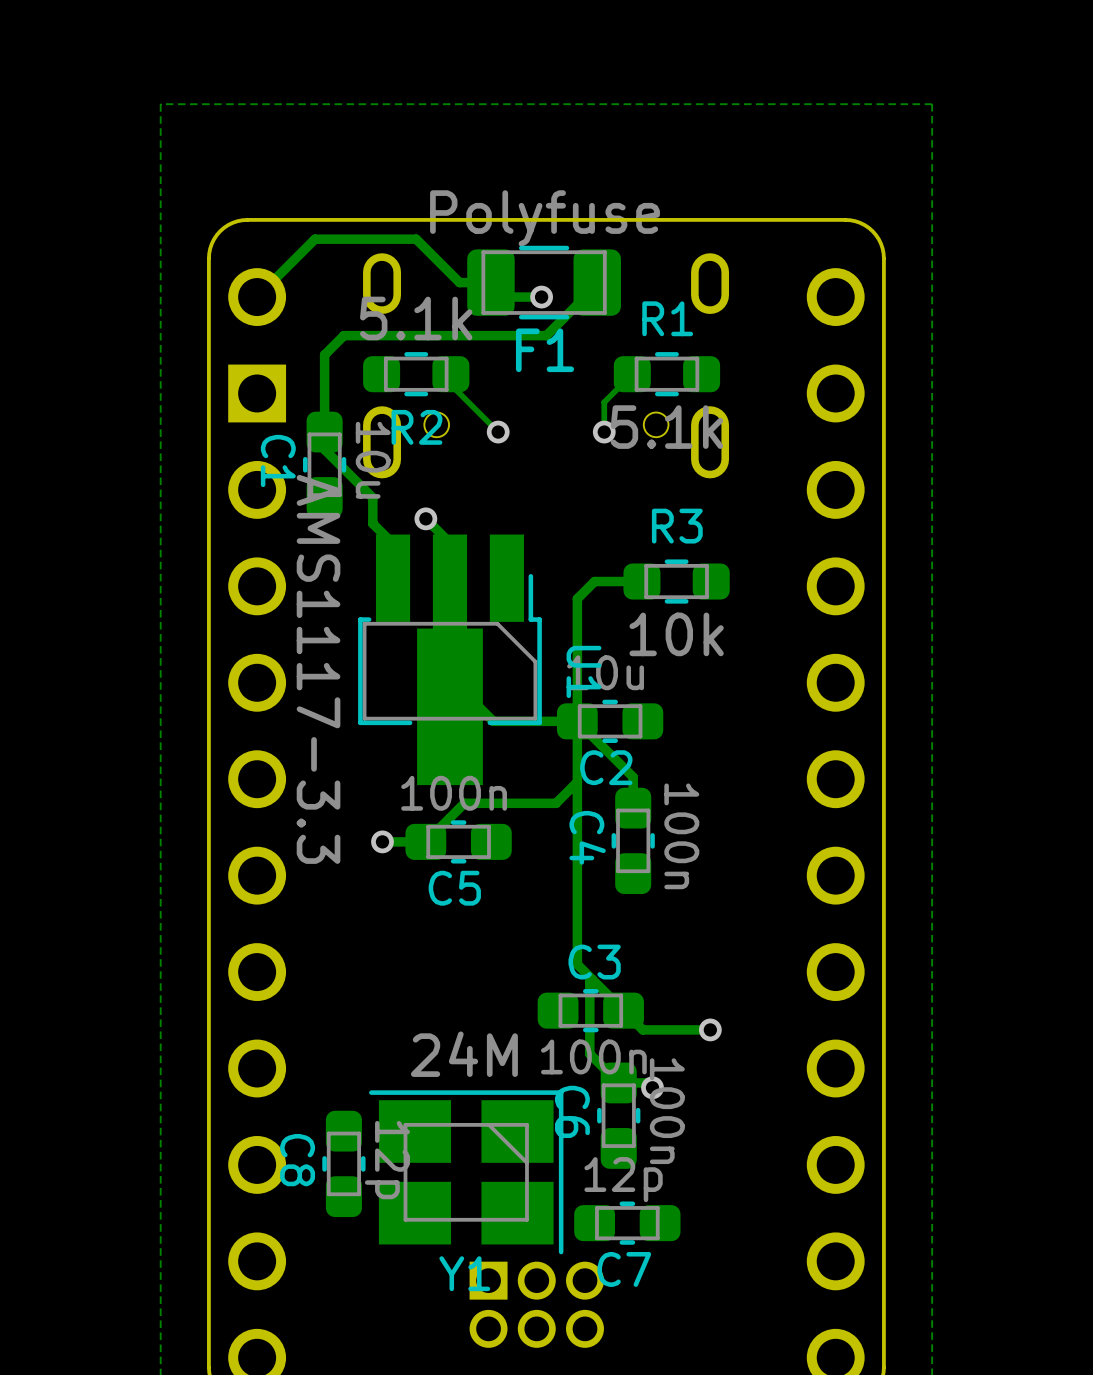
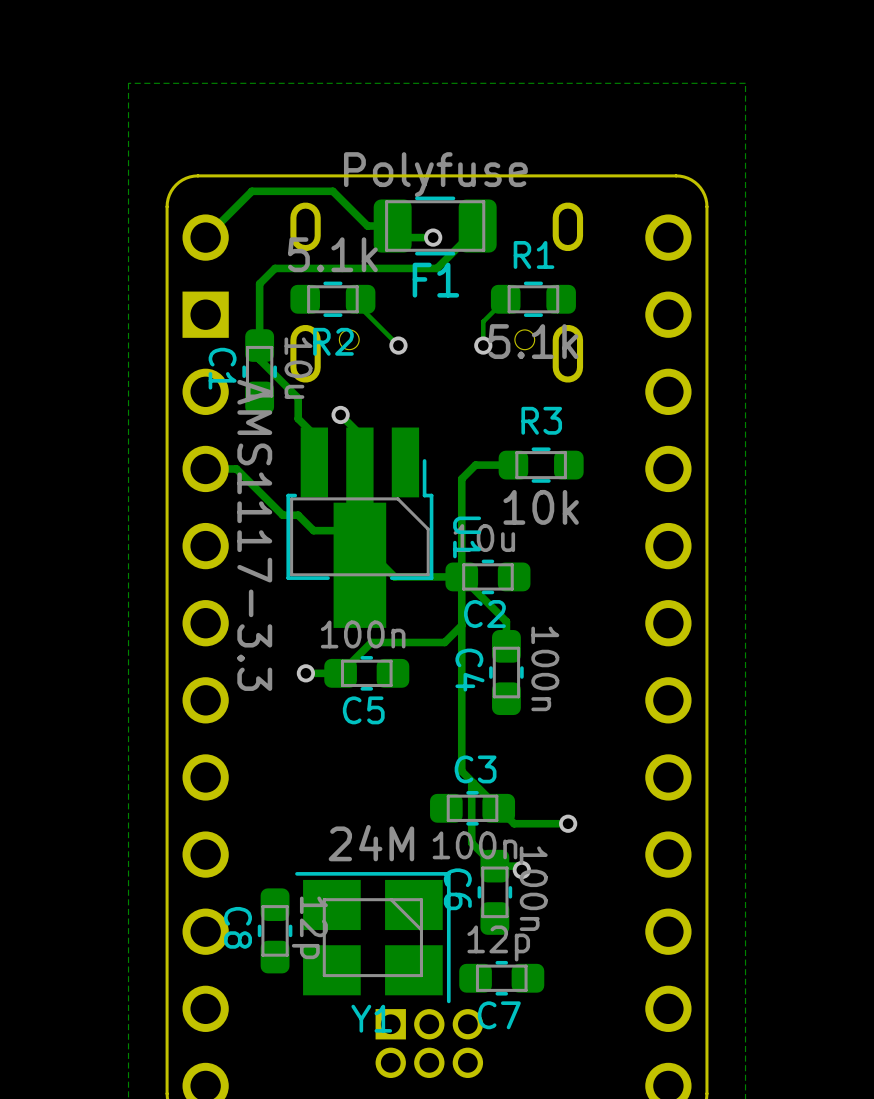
track: none -> (205, 468) (236, 468) (282, 515) (298, 515) (313, 530) (344, 530) (359, 515)

